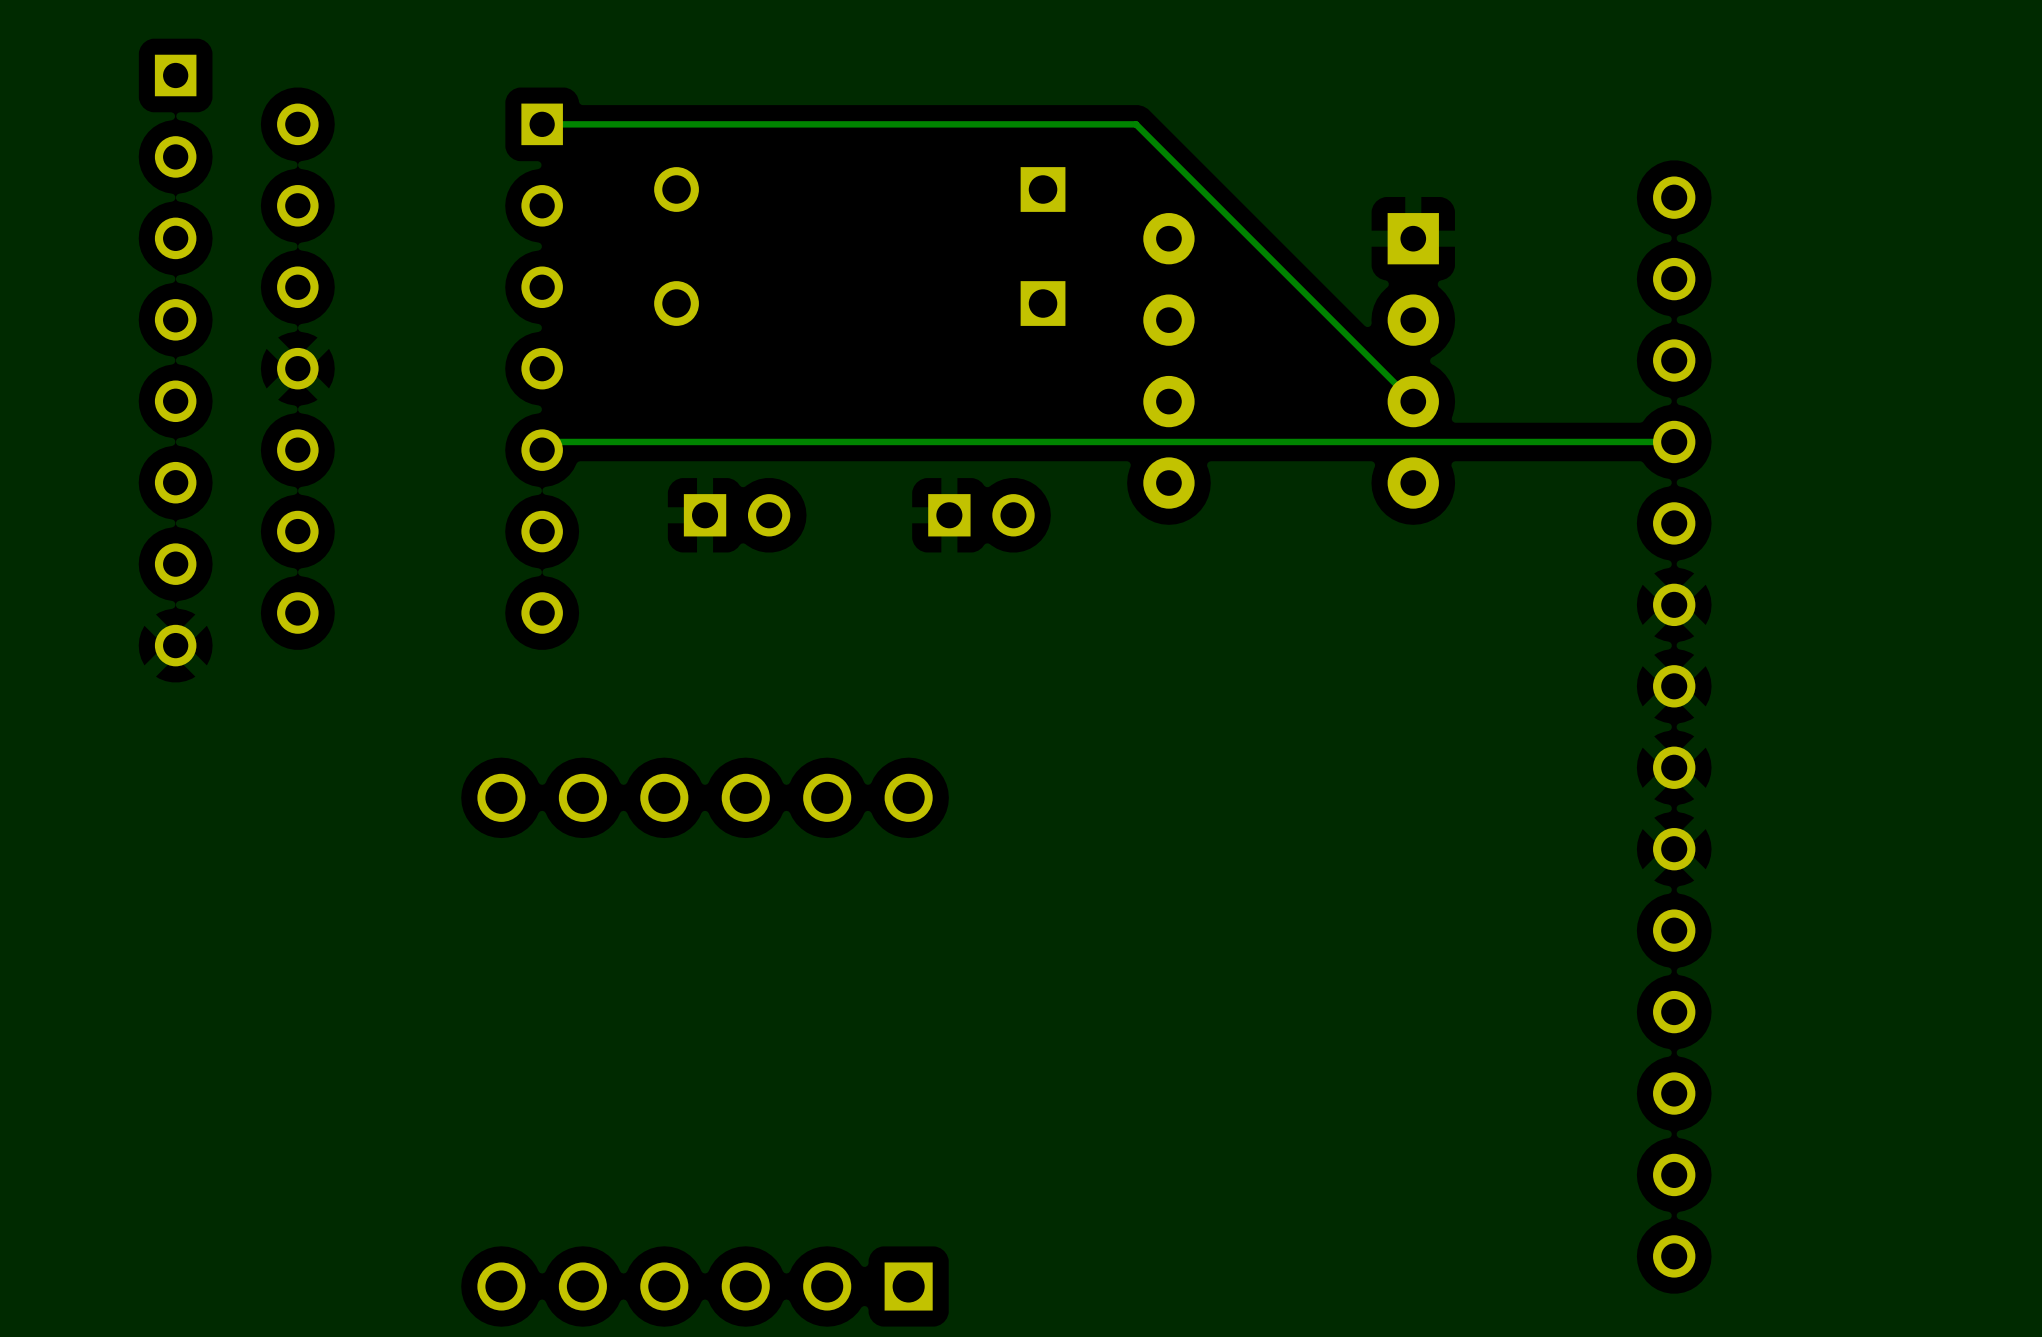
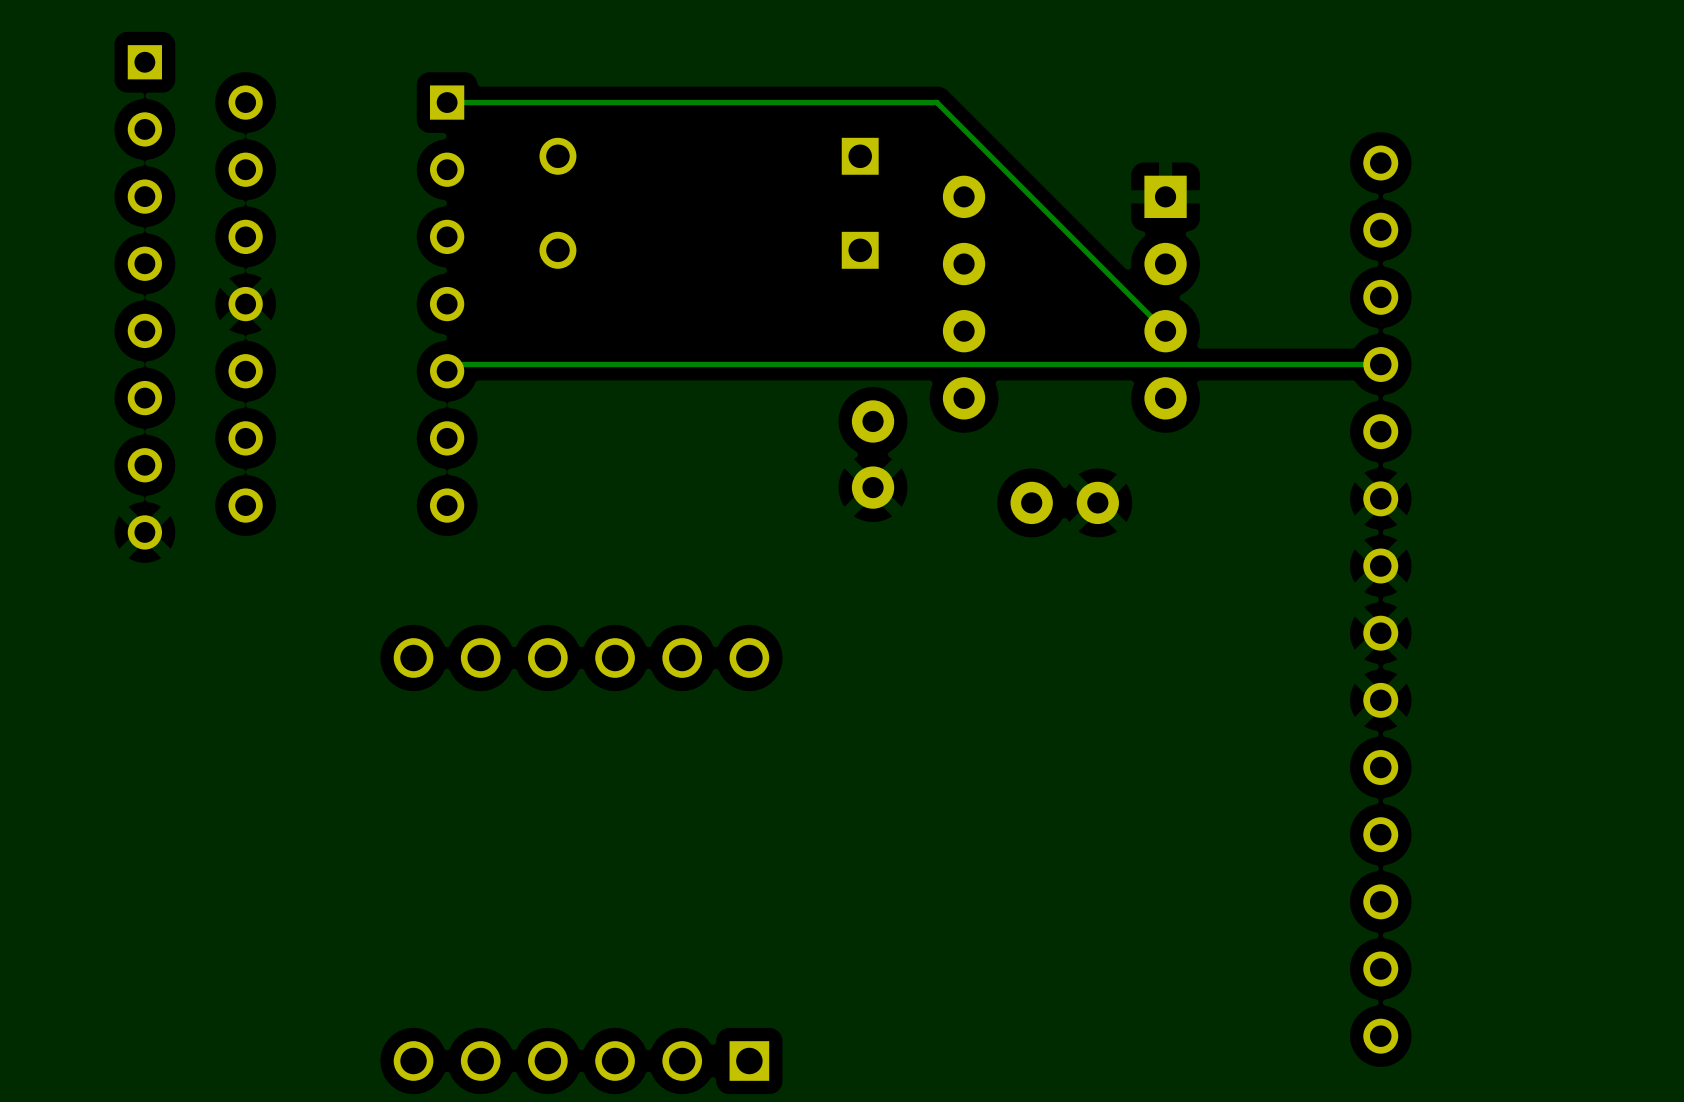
part: (737, 515) -> none
part: (981, 515) -> none
part: none -> (873, 454)
part: none -> (1064, 502)

